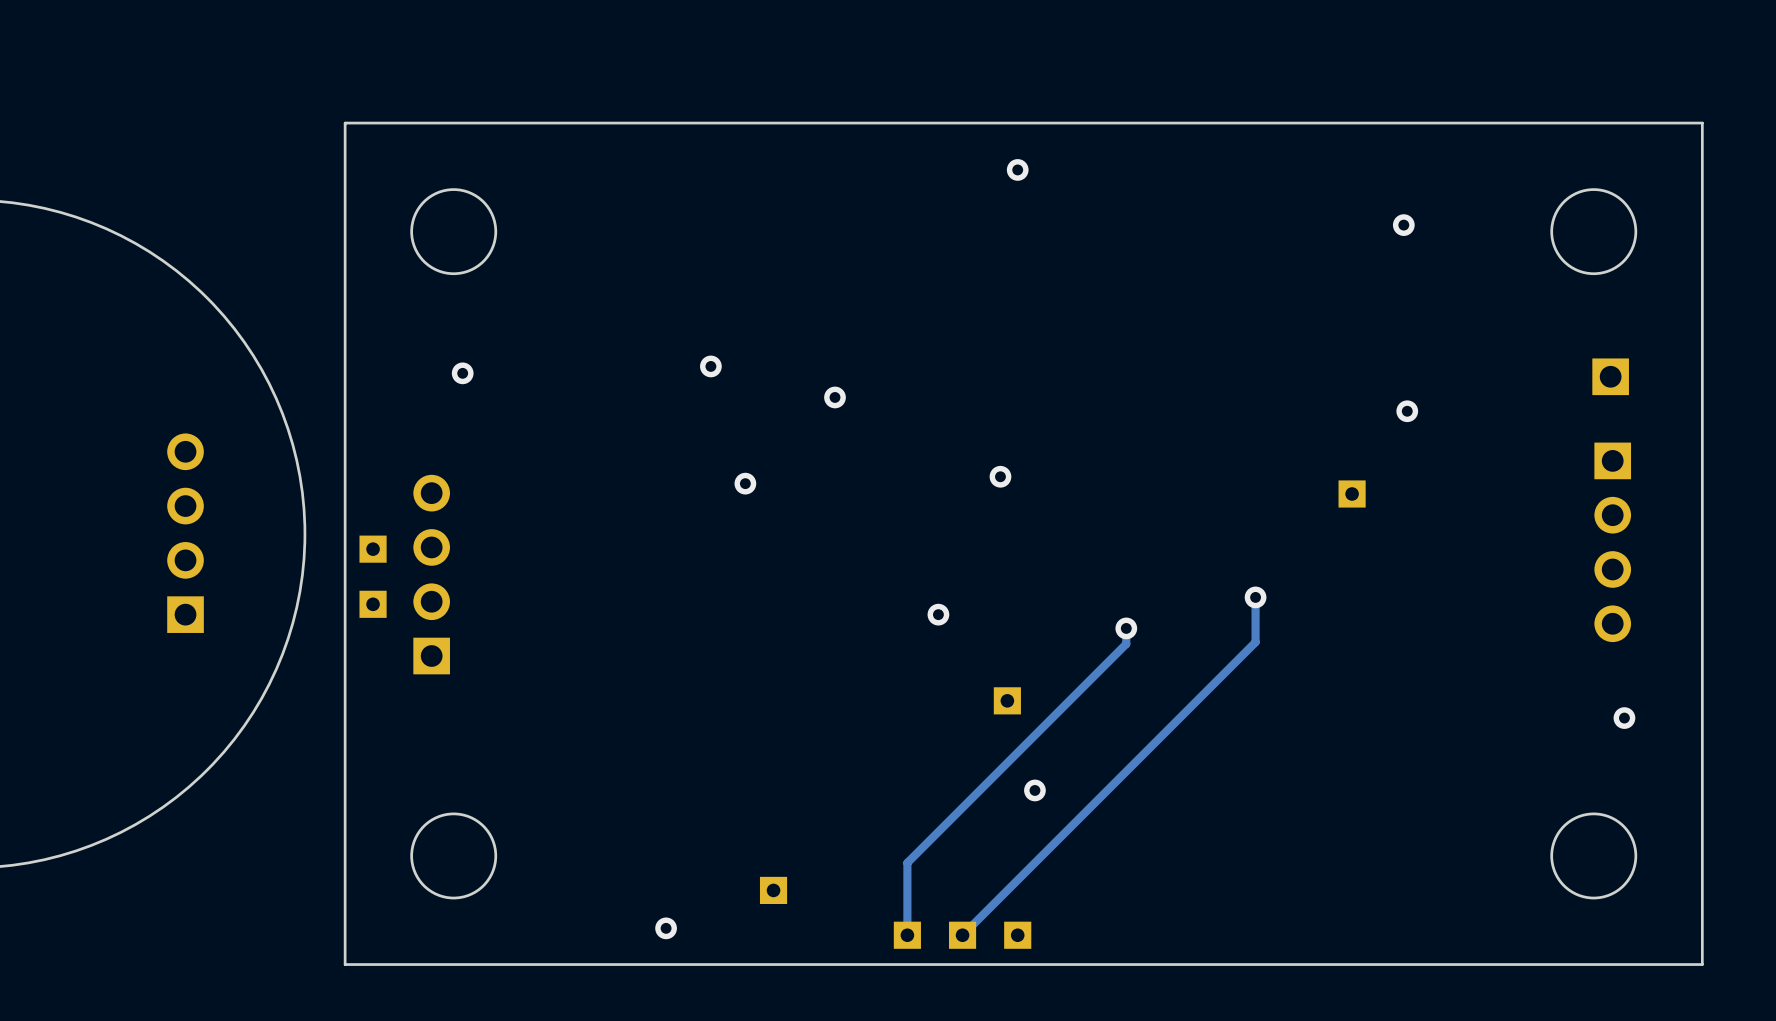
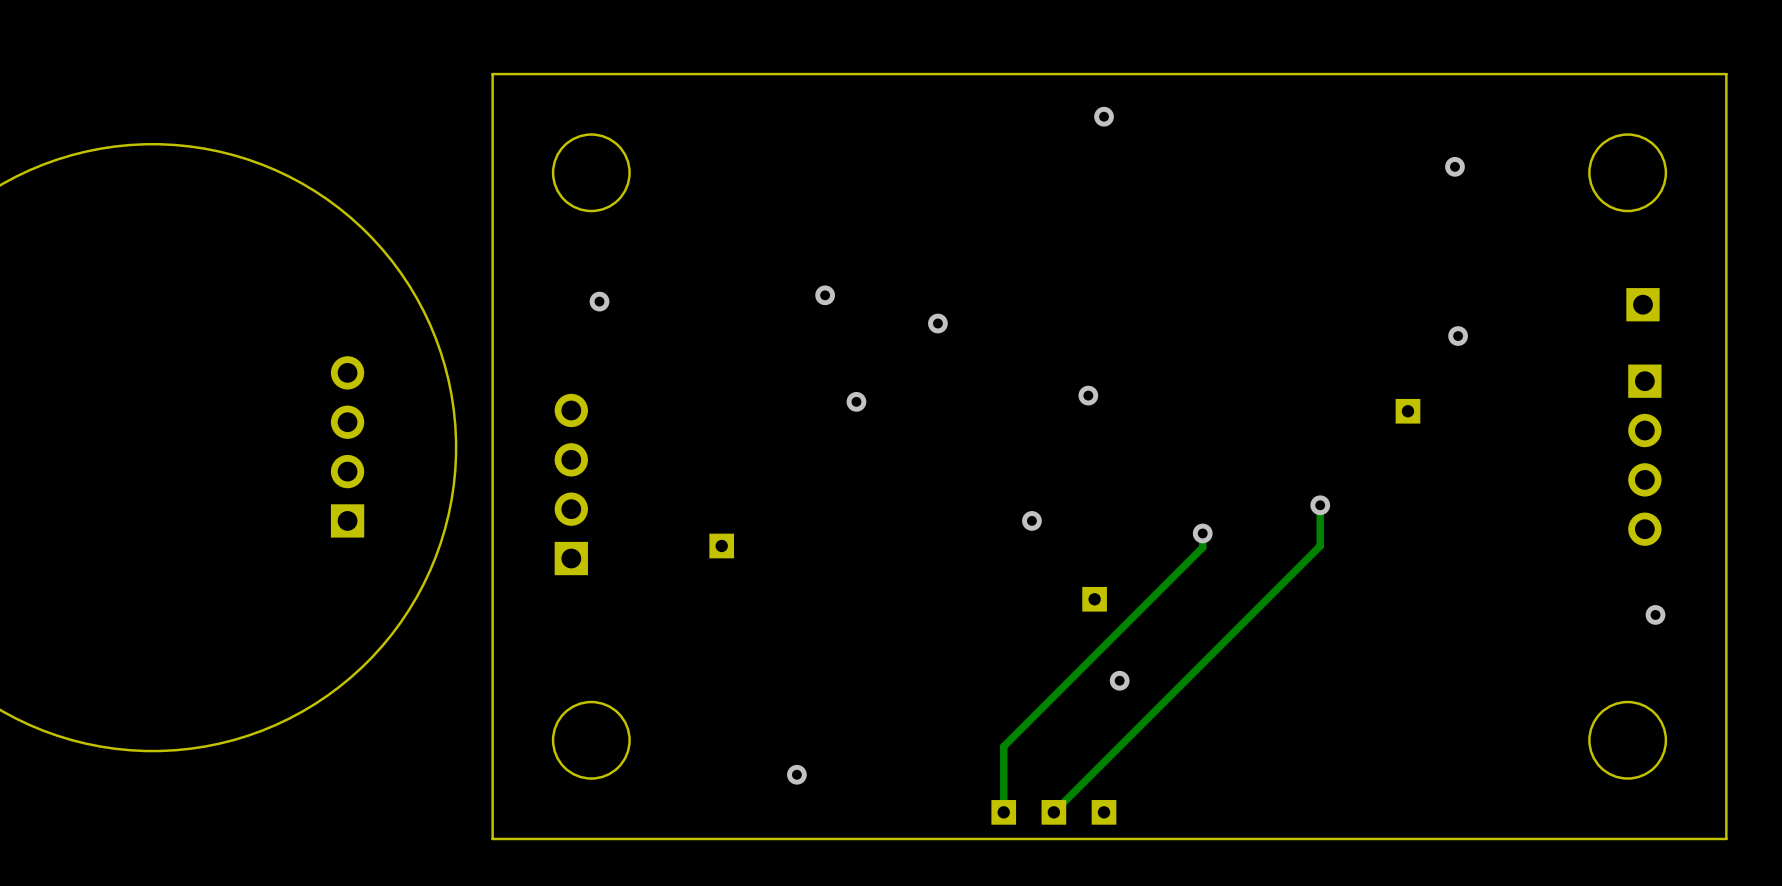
part: (373, 549) -> none
part: (373, 604) -> none
part: none -> (721, 545)
part: (773, 890) -> none
via position: (666, 928) -> (796, 774)

